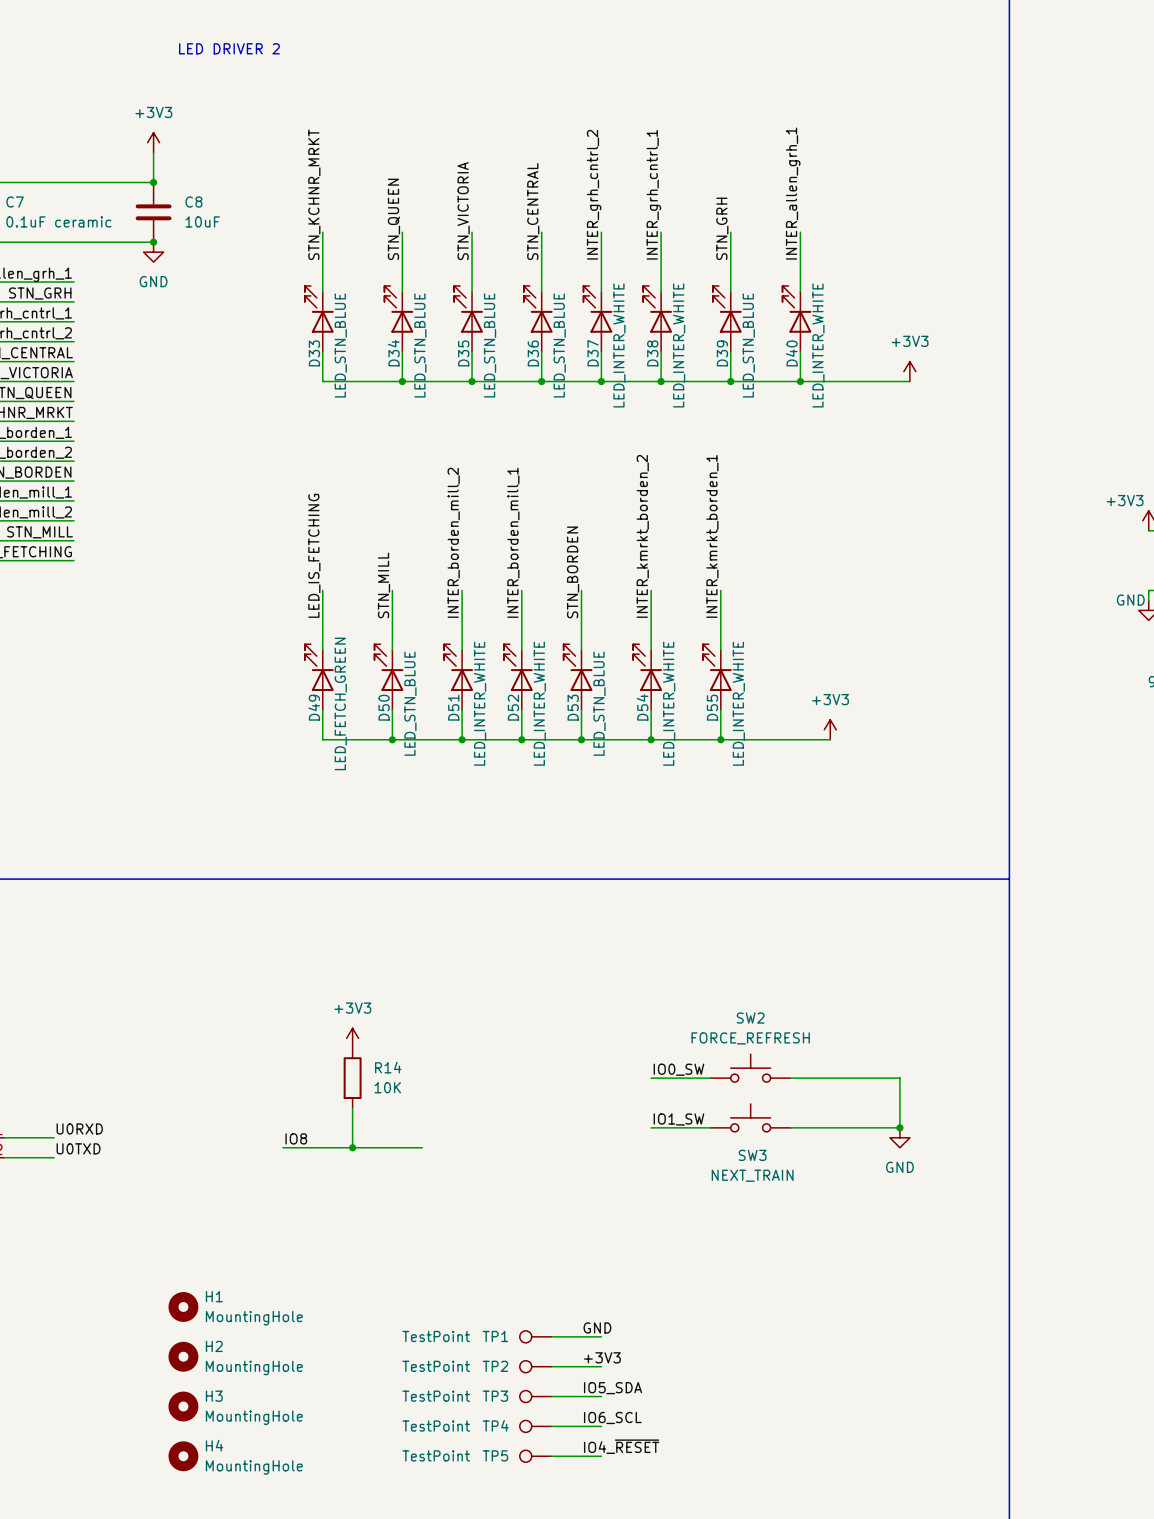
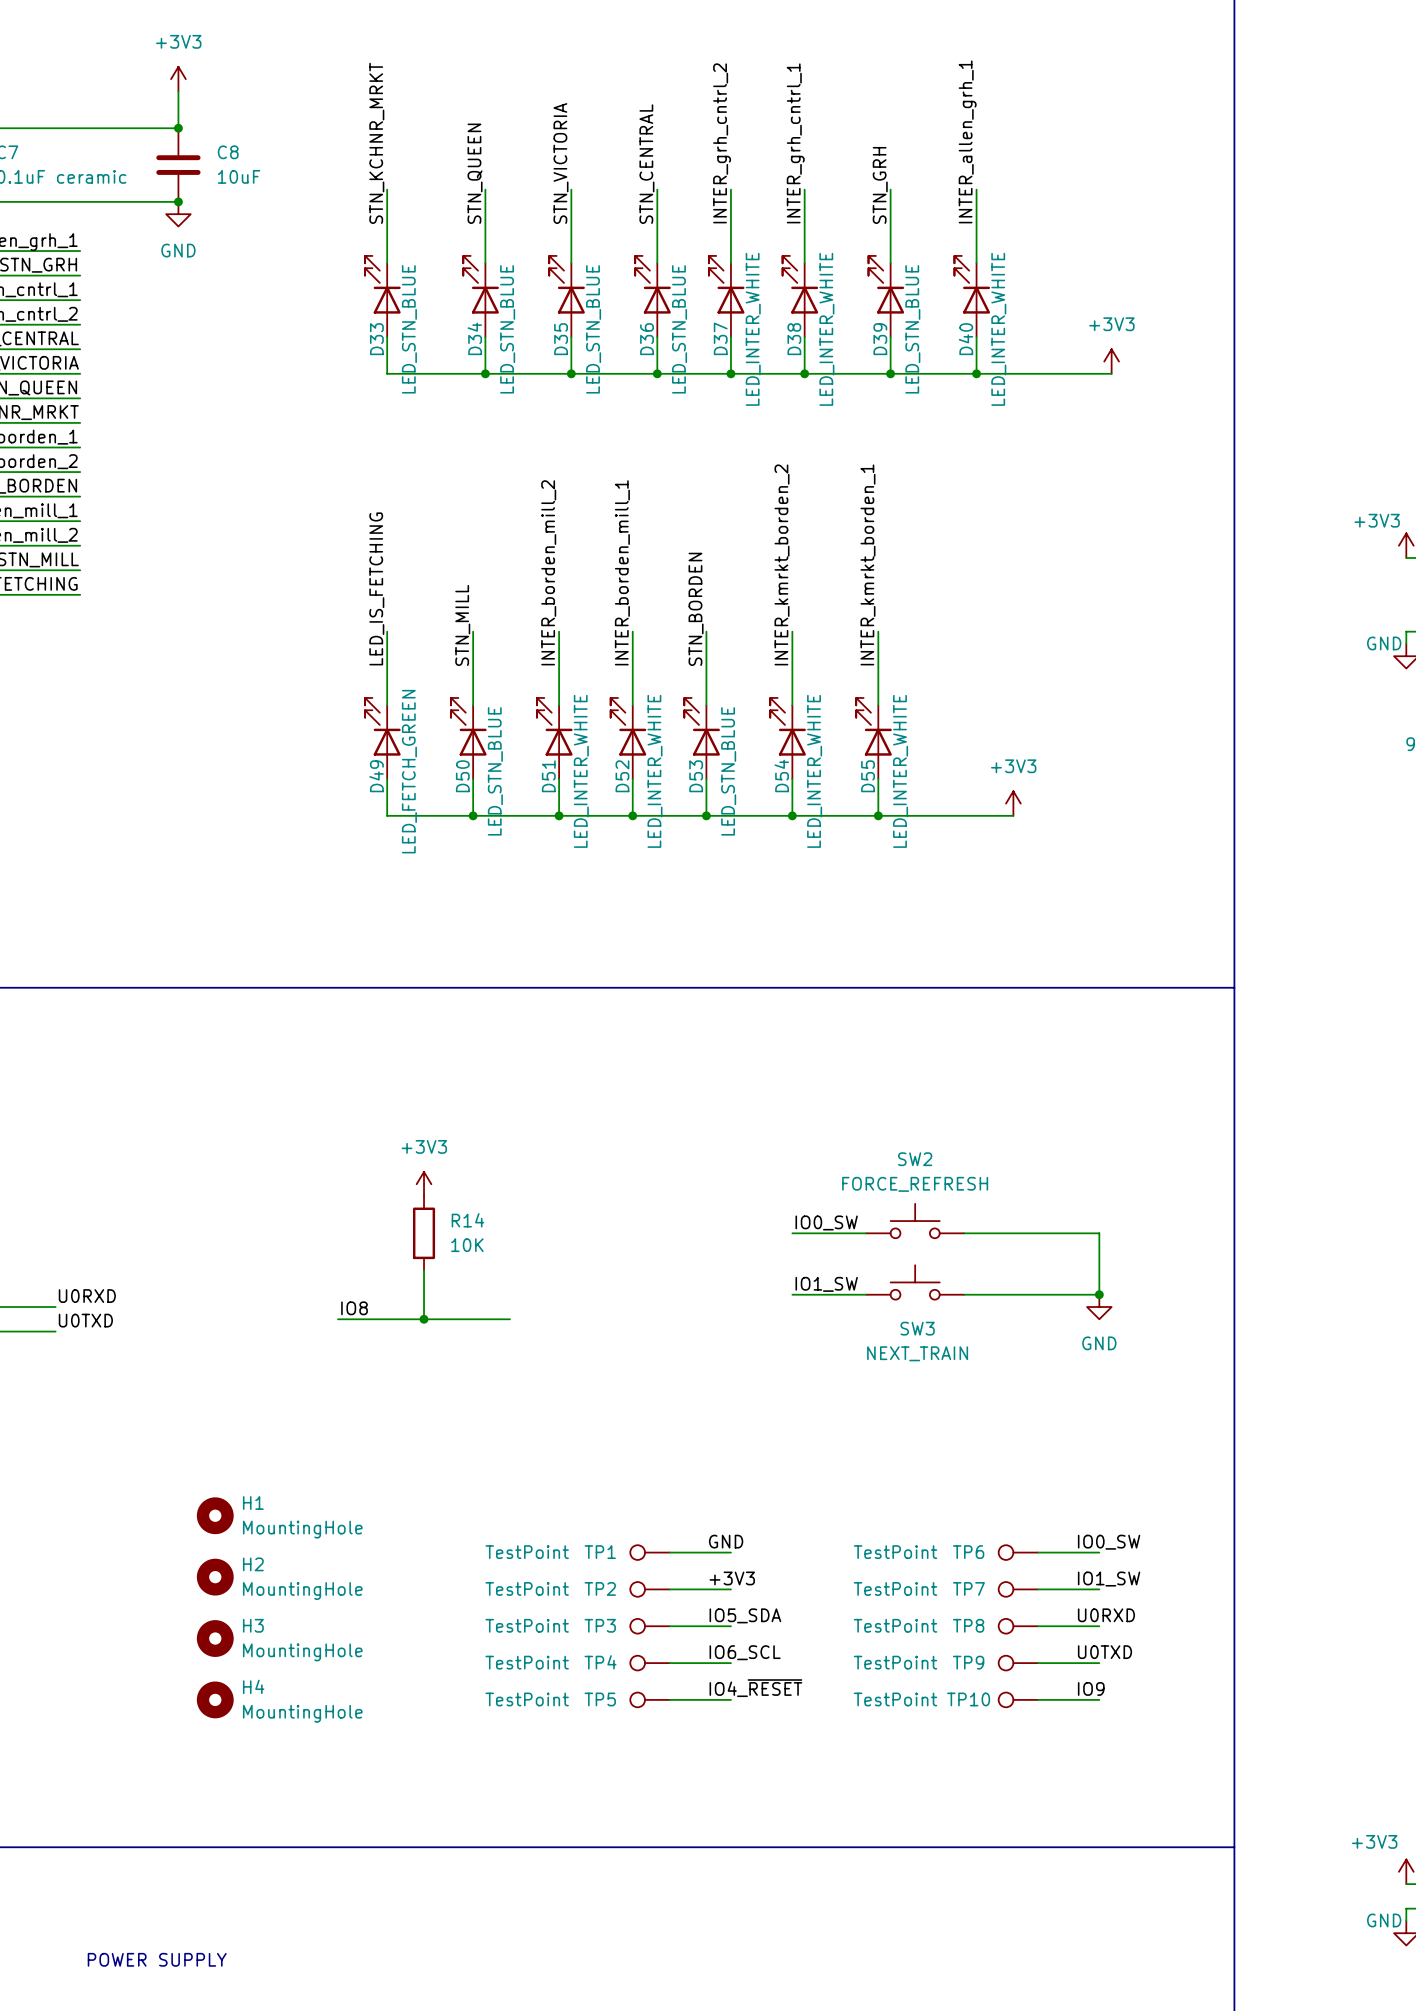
label: none -> IO0_SW (1109, 1542)
TP6: none -> TestPoint (1018, 1552)
wire: none -> (1037, 1552) (1099, 1552)
label: none -> IO1_SW (1109, 1579)
TP7: none -> TestPoint (1018, 1589)
wire: none -> (1037, 1589) (1099, 1589)
label: none -> U0RXD (1106, 1615)
TP8: none -> TestPoint (1018, 1626)
wire: none -> (1037, 1626) (1099, 1626)
label: none -> U0TXD (1104, 1652)
TP9: none -> TestPoint (1018, 1663)
wire: none -> (1037, 1663) (1099, 1663)
label: none -> IO9 (1091, 1688)
TP10: none -> TestPoint (1018, 1699)
wire: none -> (1037, 1699) (1099, 1699)

